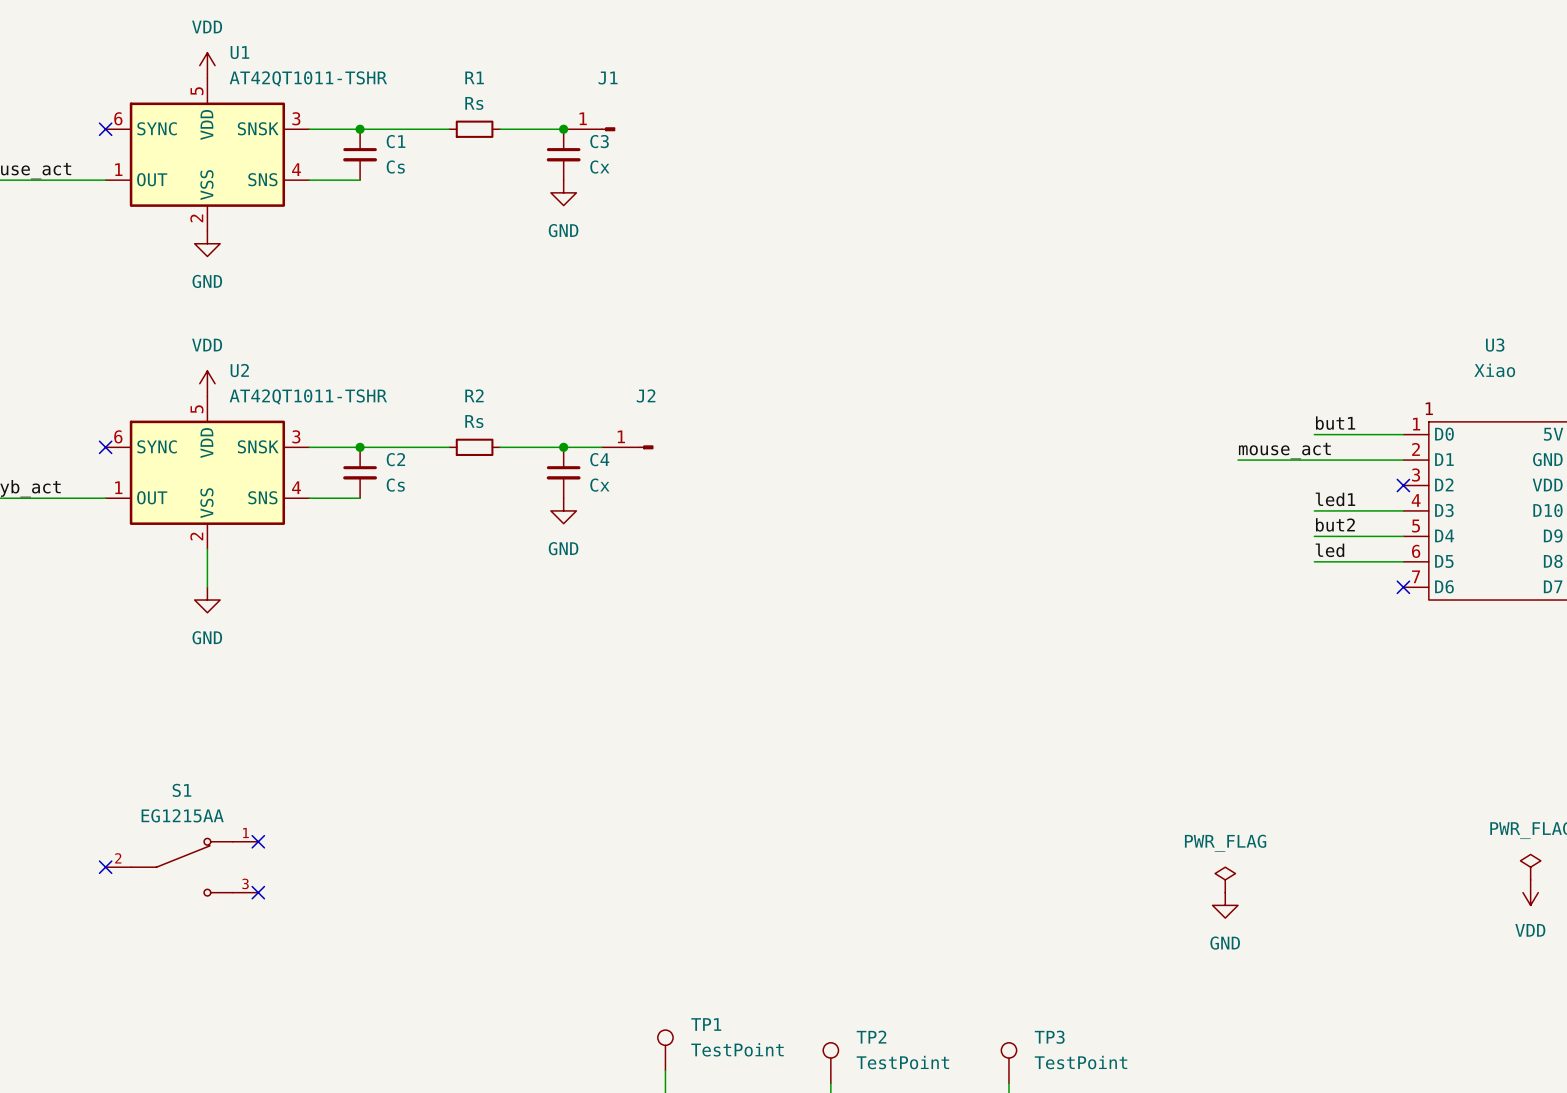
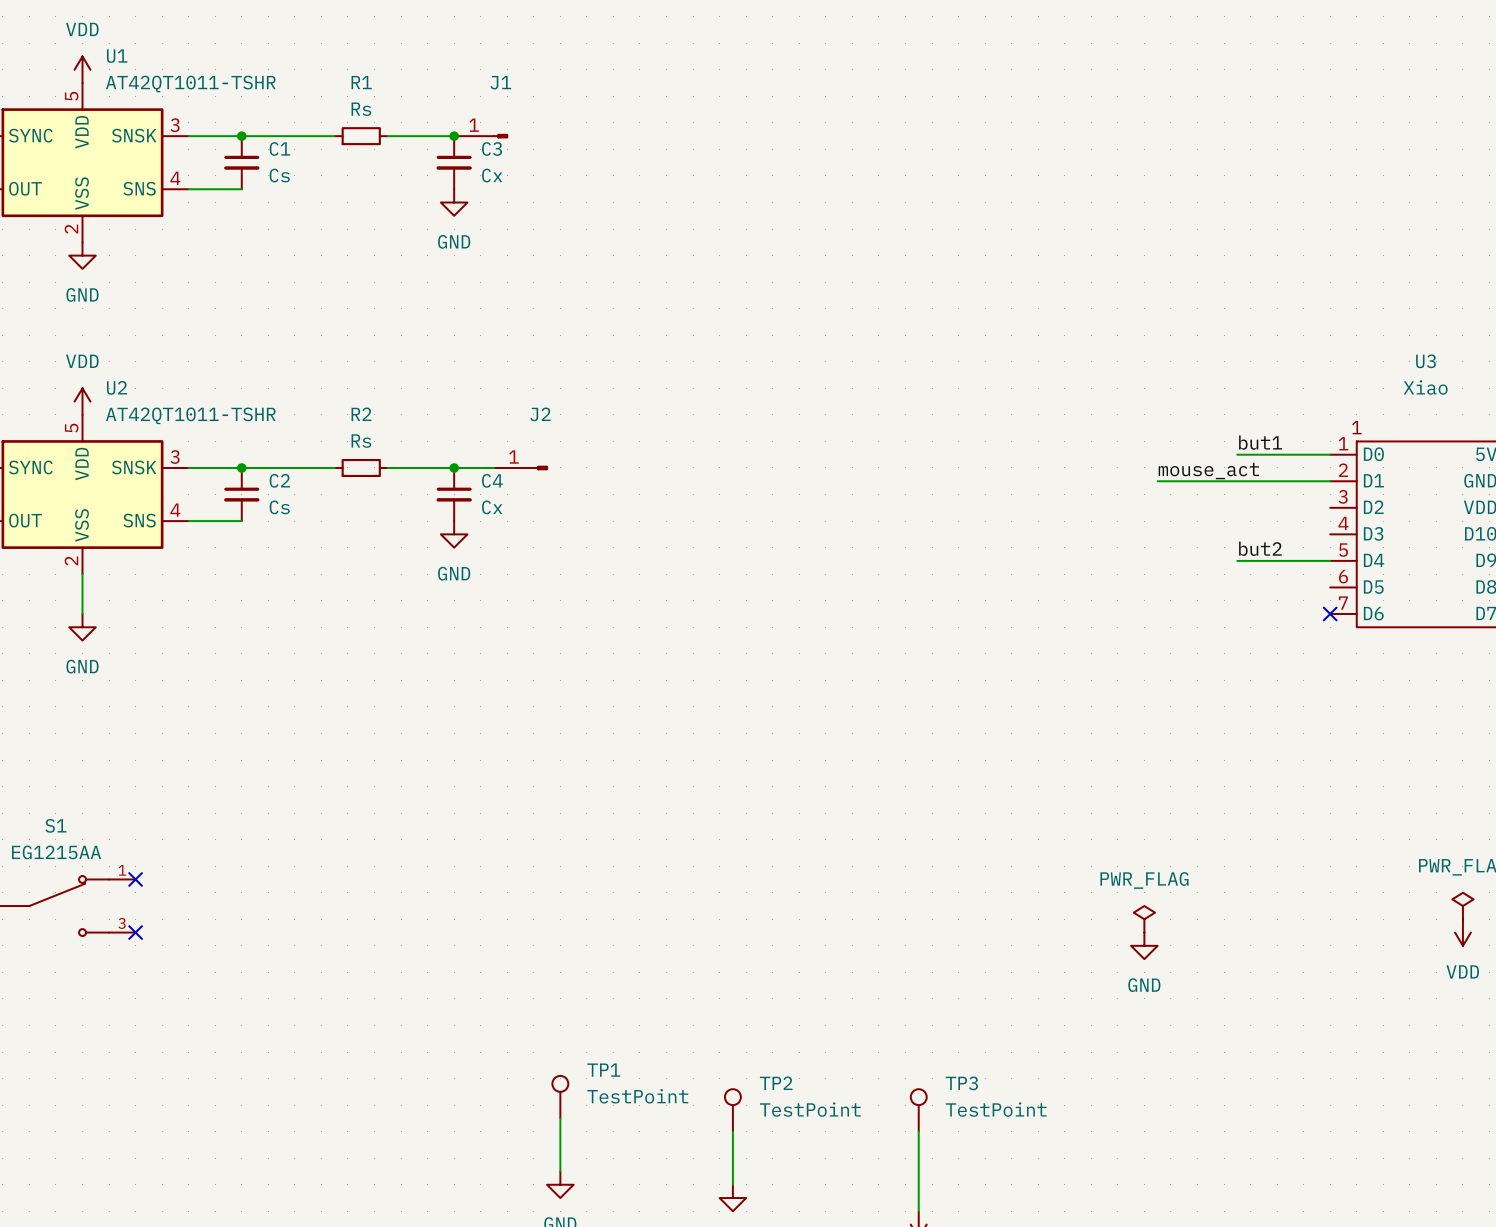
no-connect mark: (1403, 485) -> none
label: led1 (1335, 499) -> none
wire: (1314, 510) (1403, 510) -> none
label: led (1329, 550) -> none
wire: (1314, 561) (1403, 561) -> none

